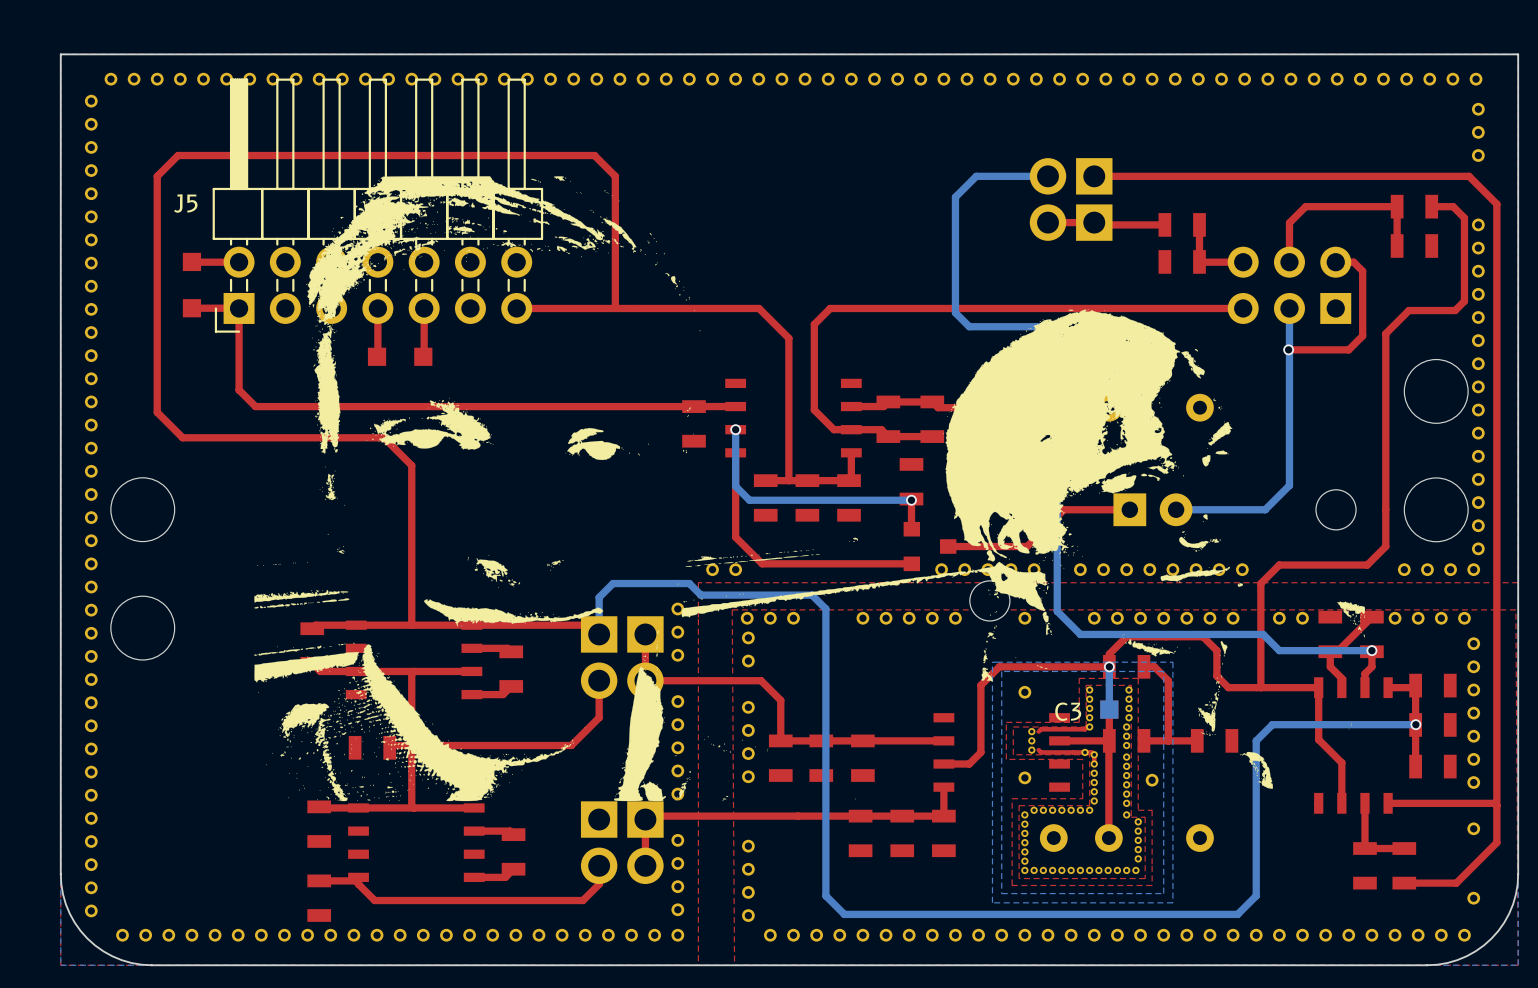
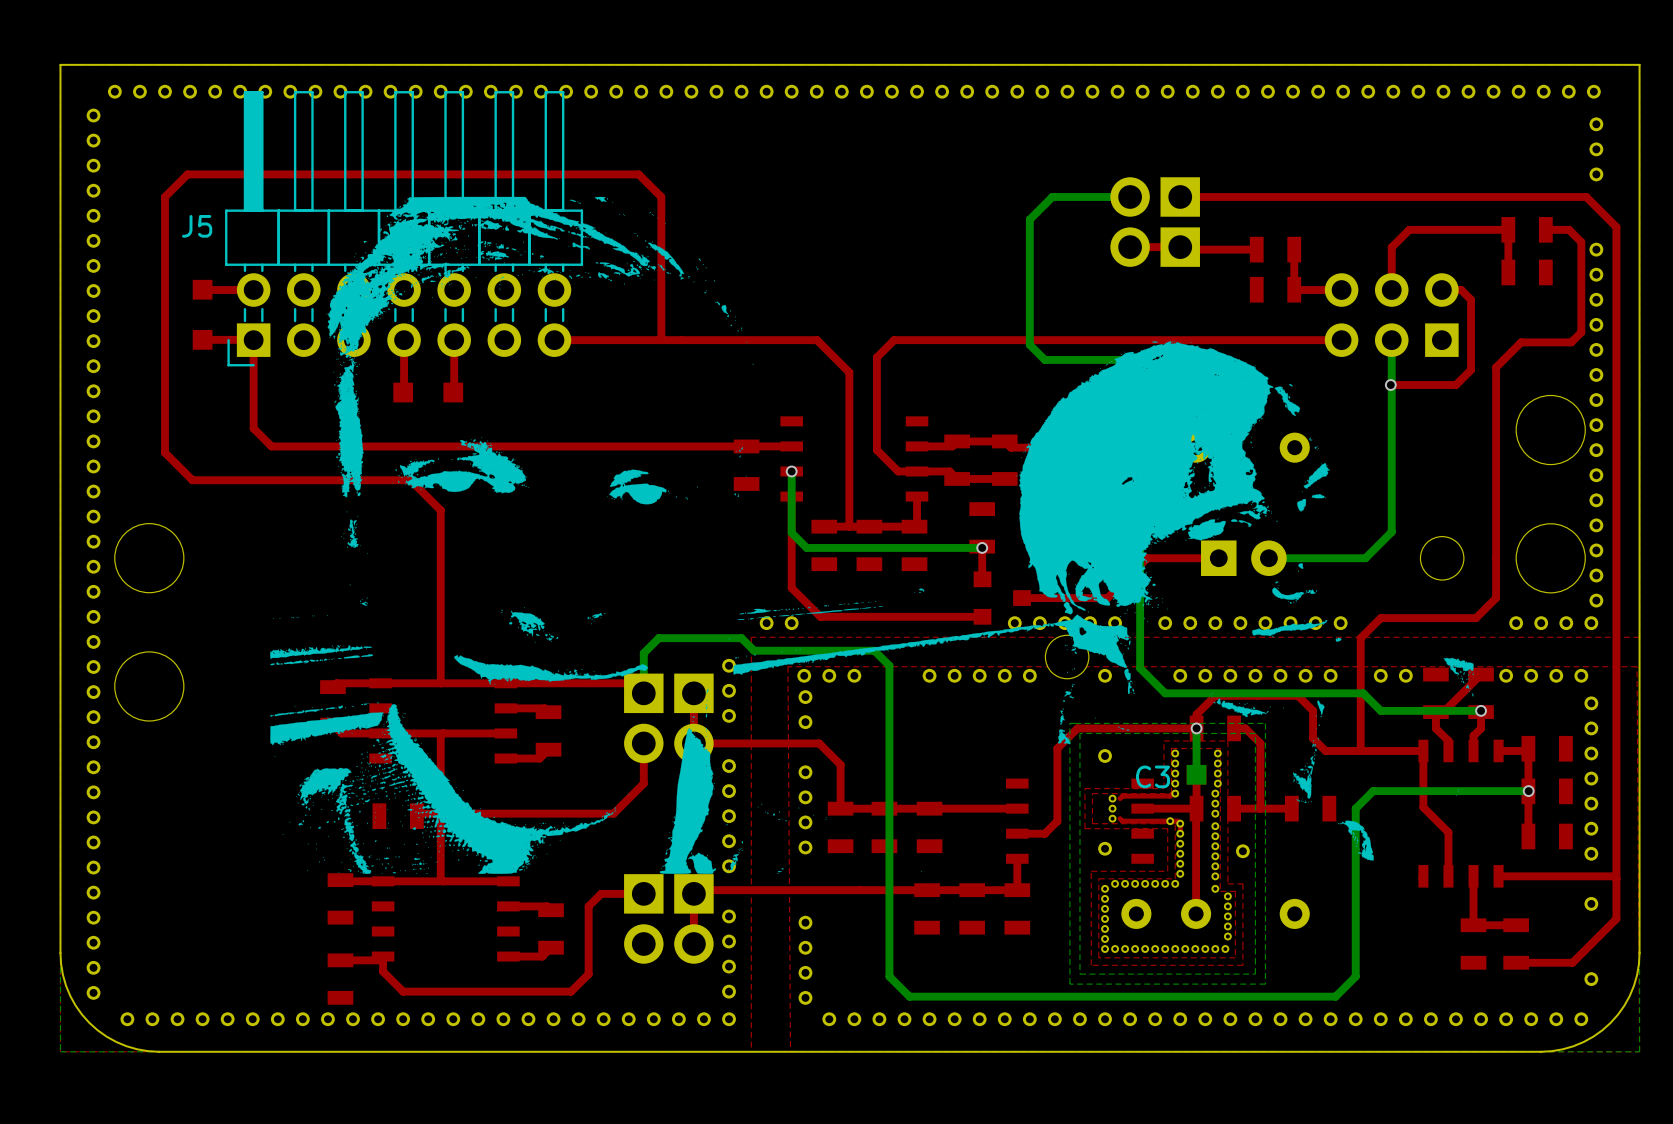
top track: (599, 865) (599, 884) (582, 900) (374, 900) (358, 884) -> (643, 893) (601, 893) (588, 906) (588, 974) (571, 991) (403, 991) (383, 971) (383, 964)

